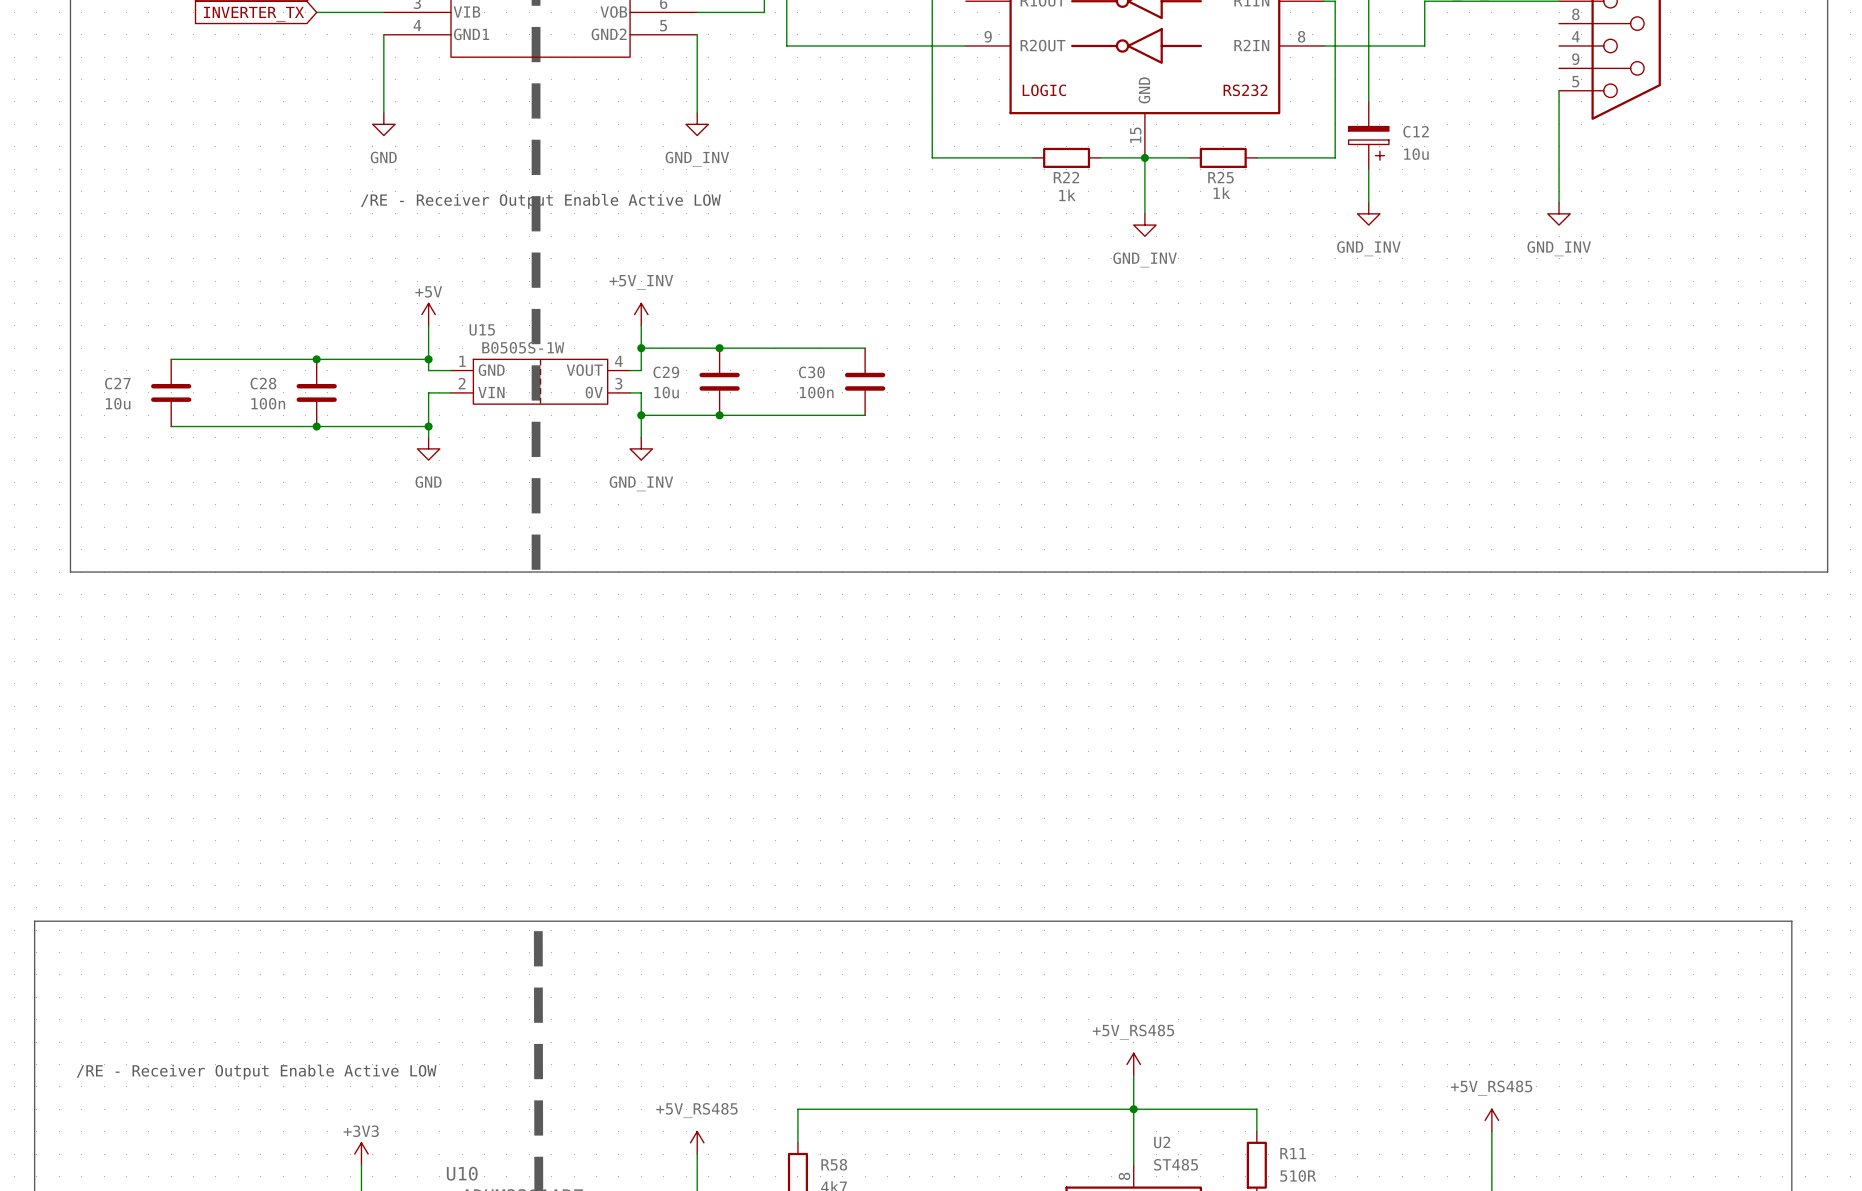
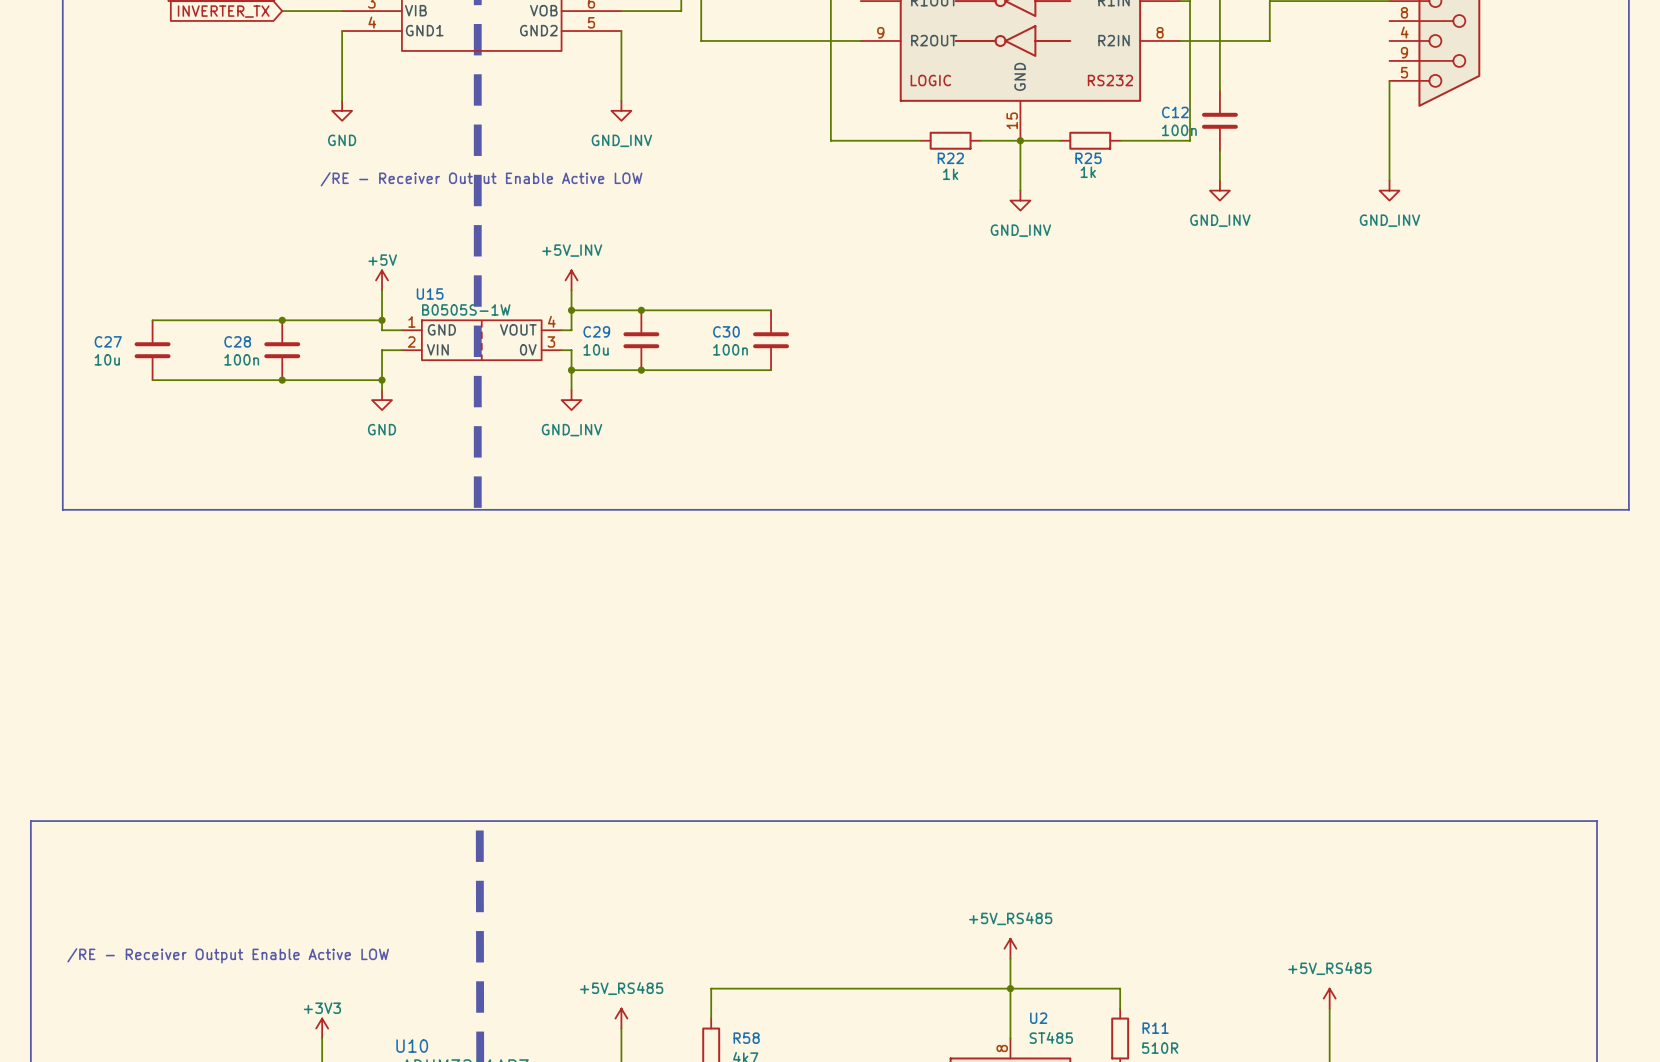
C12 symbol: [1348, 101, 1389, 170] -> [1201, 90, 1238, 151]
C12 name position: C12 (1416, 131) -> C12 (1175, 112)
C12 value: 10u (1416, 154) -> 100n (1179, 130)

